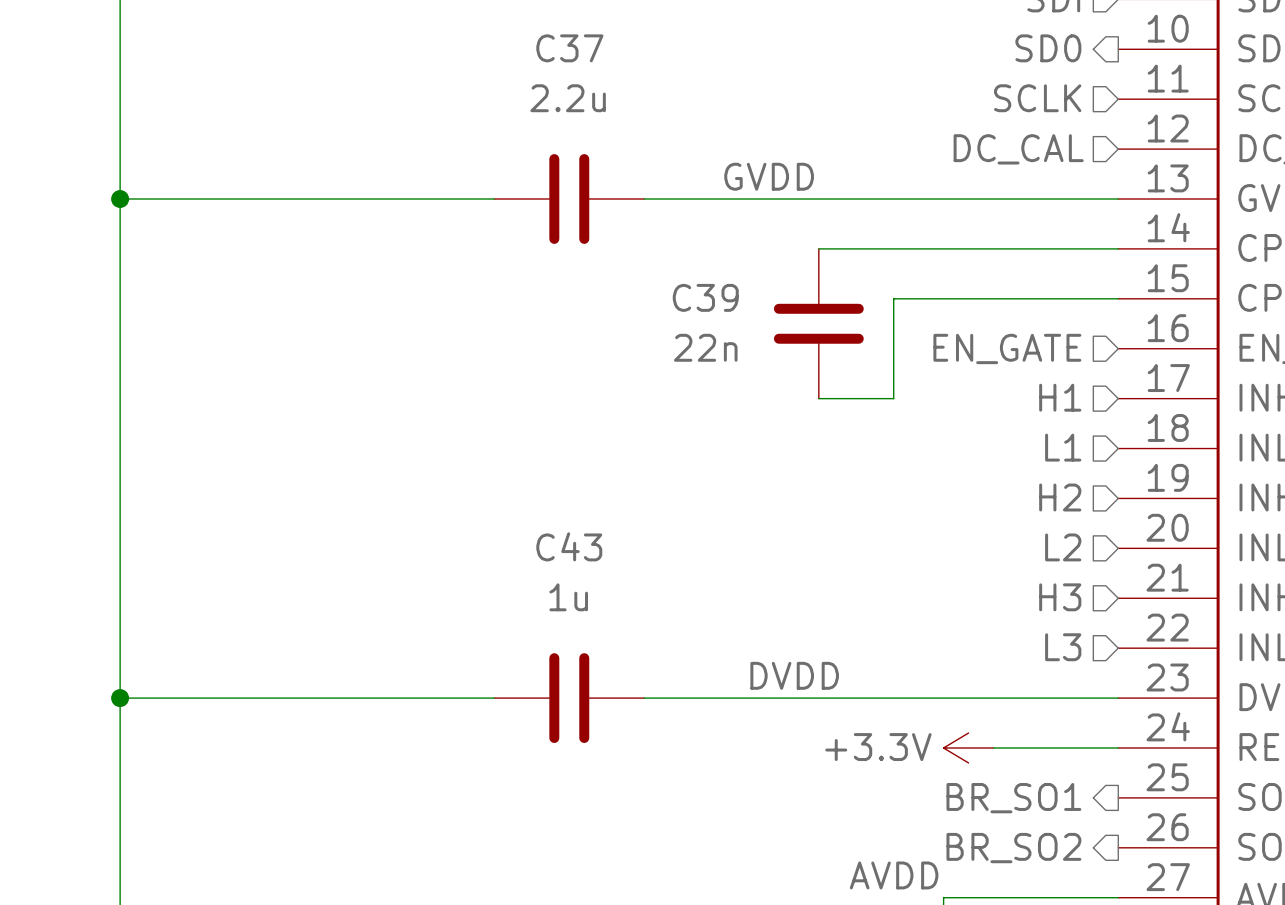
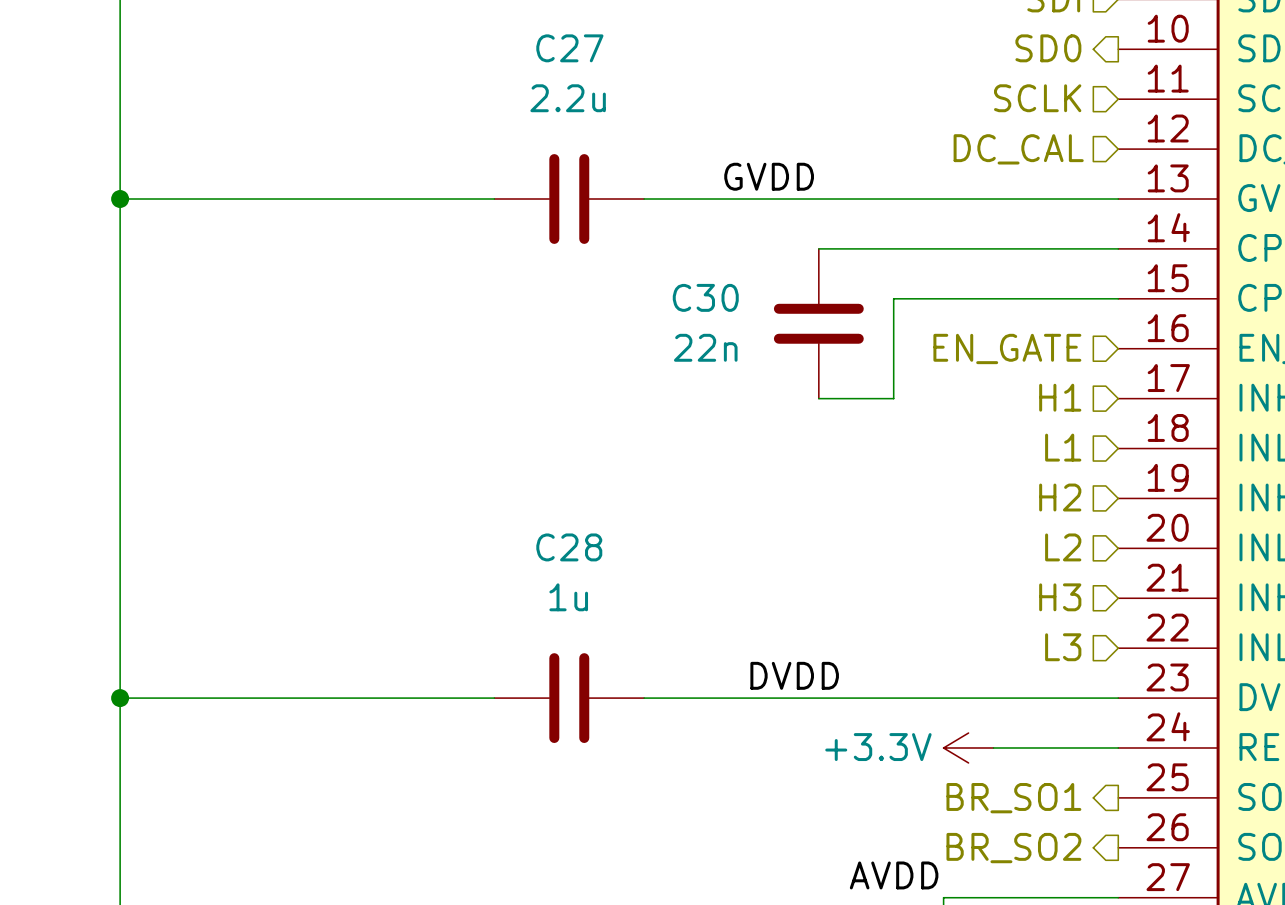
C37 name: C37 (569, 48) -> C27 (569, 48)
C39 name: C39 (705, 297) -> C30 (705, 297)
C43 name: C43 (569, 546) -> C28 (569, 547)

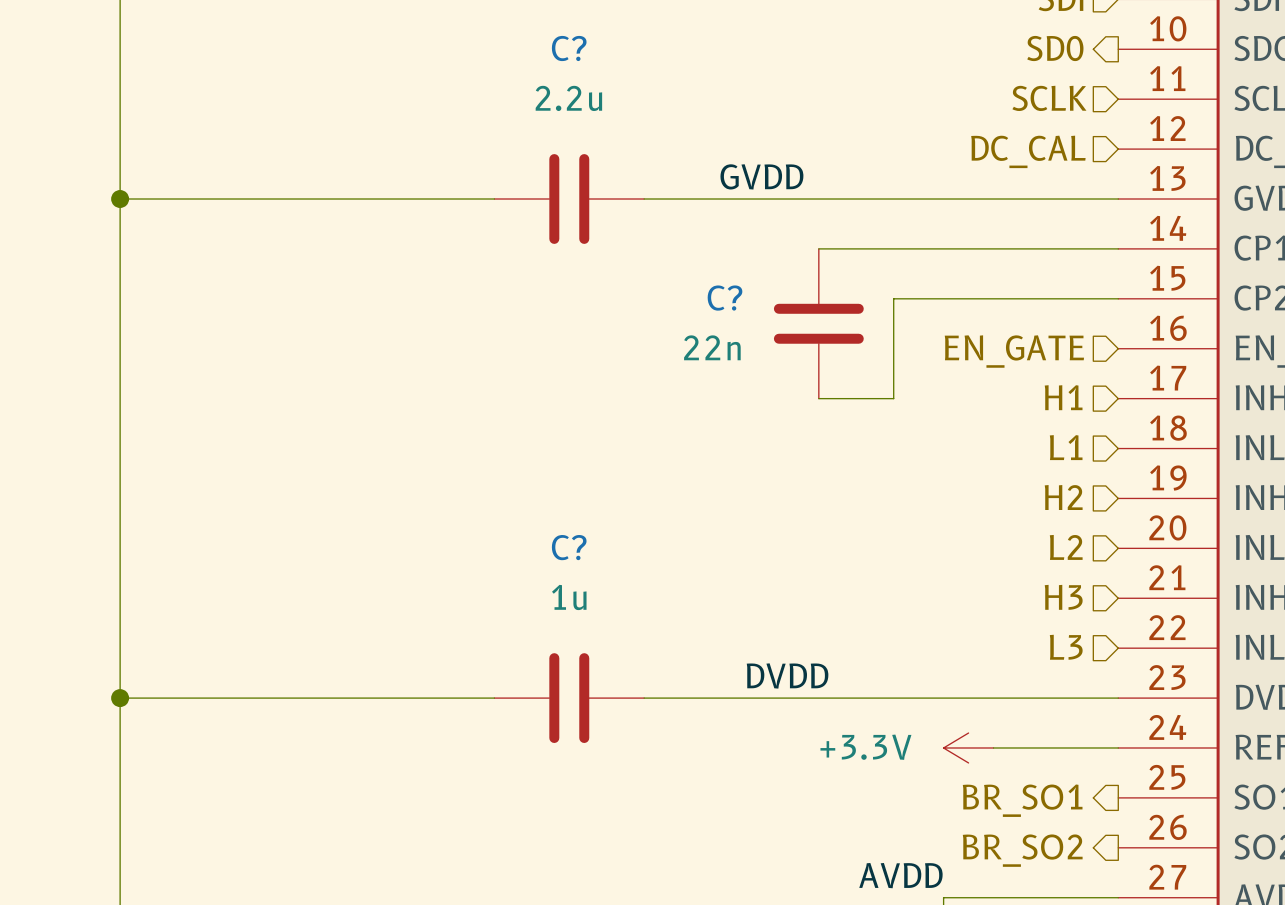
C27 name: C27 (569, 48) -> C? (569, 48)
C30 name: C30 (705, 297) -> C? (725, 298)
C28 name: C28 (569, 547) -> C? (569, 547)

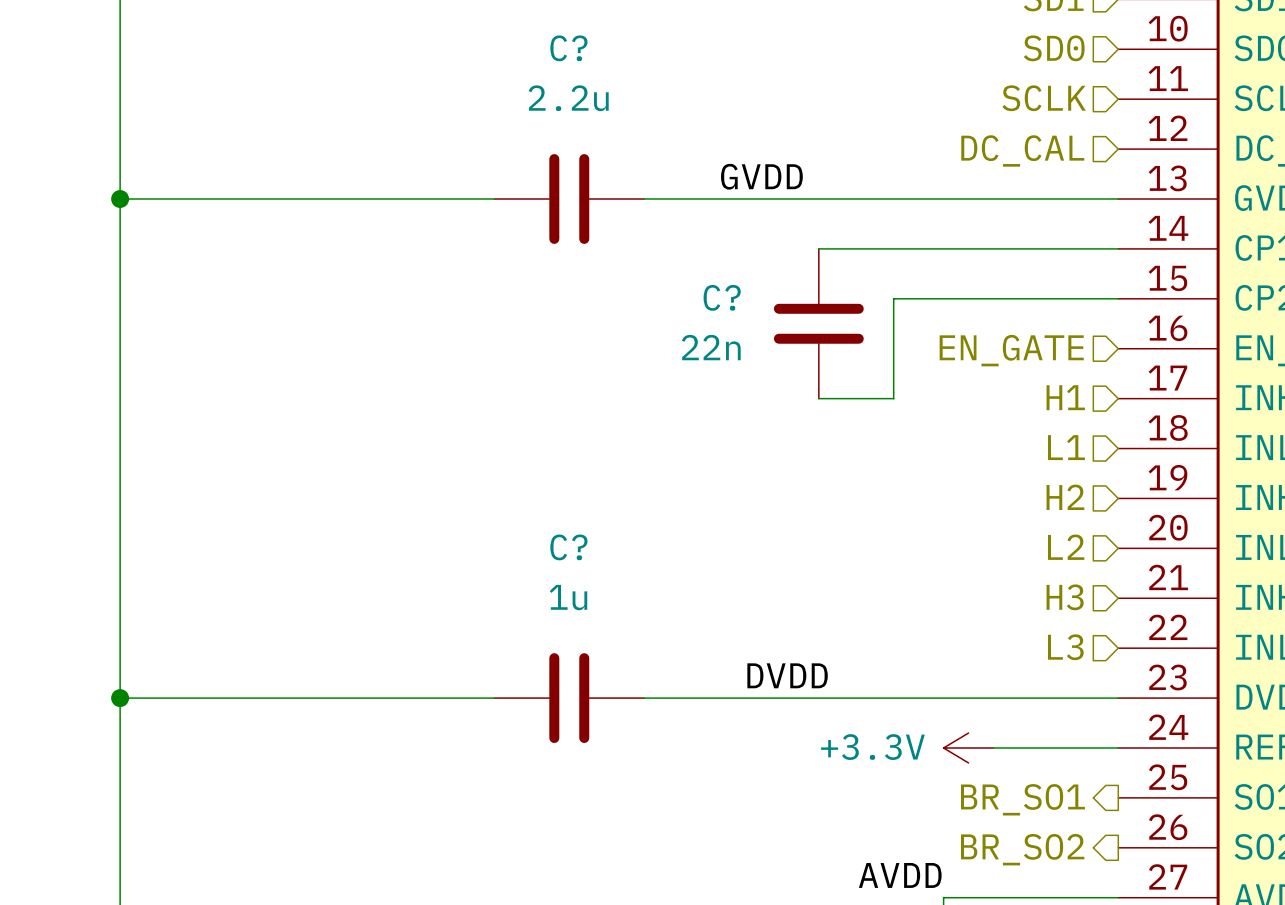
hierarchical label shape: output (1055, 48) -> input (1054, 48)

